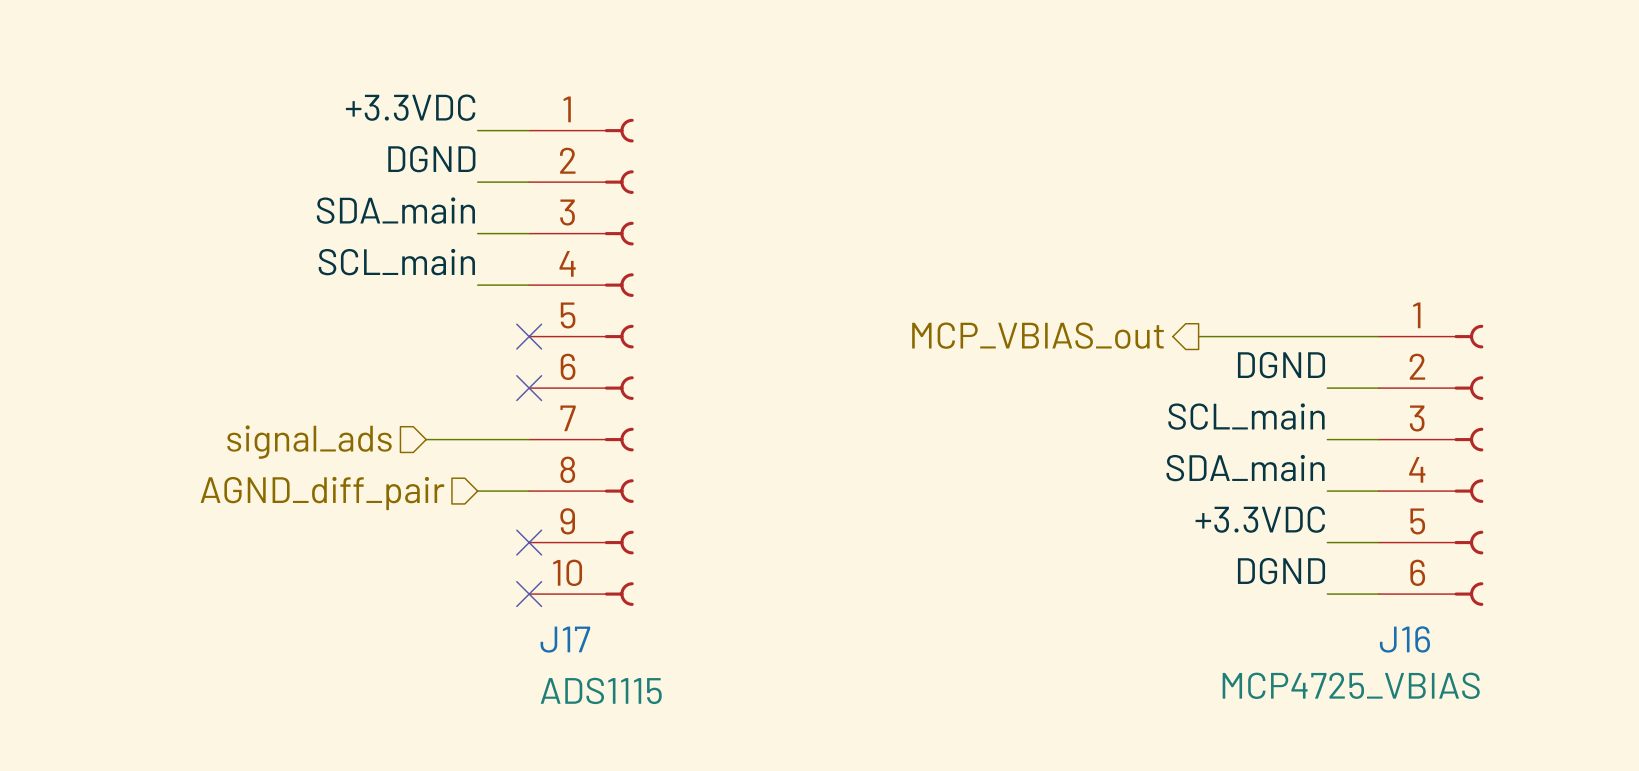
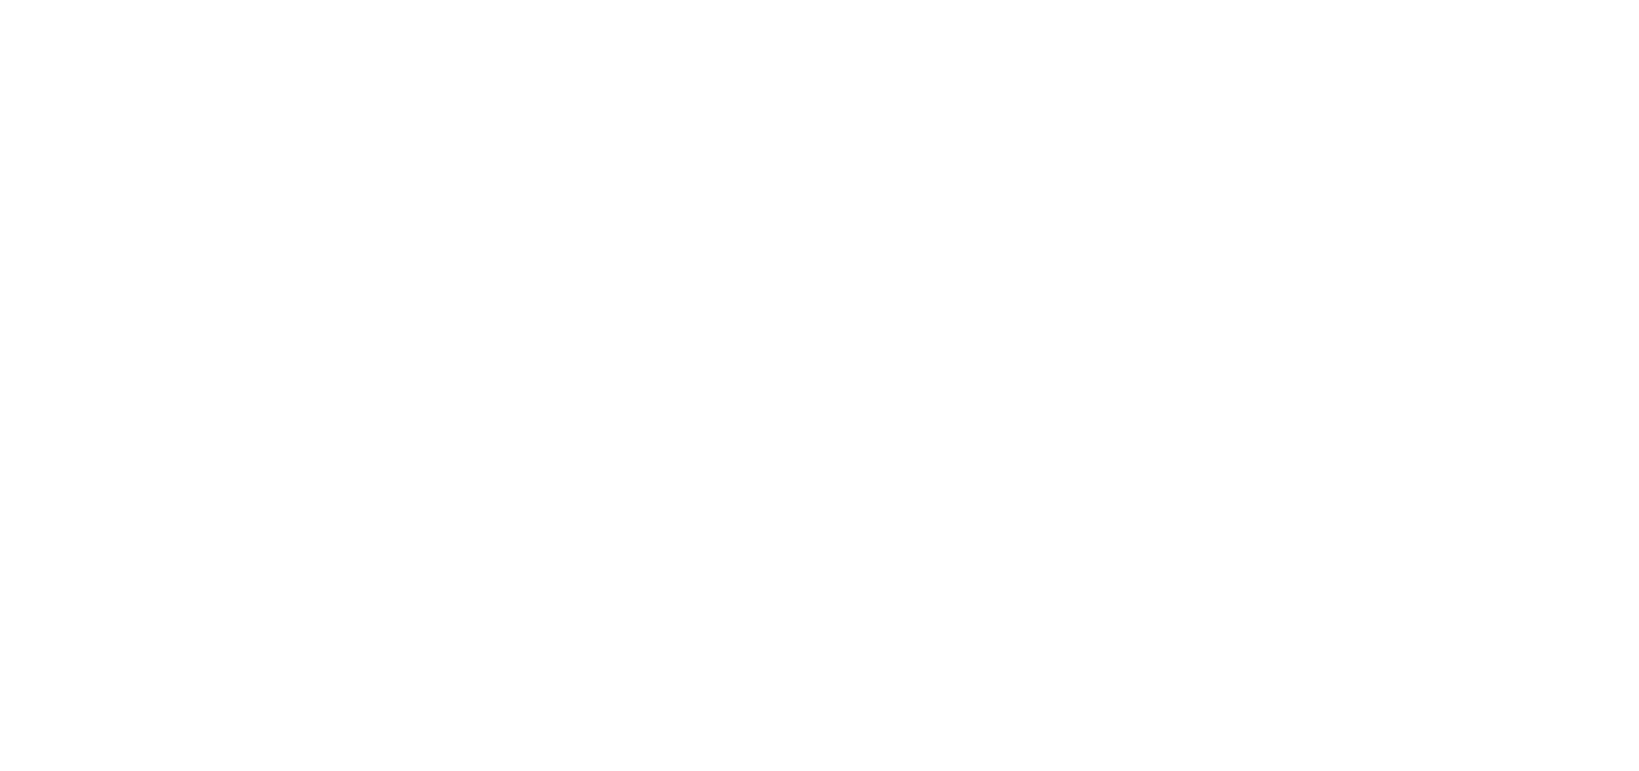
label: +3.3VDC (410, 107) -> none
wire: (477, 130) (529, 130) -> none
label: DGND (431, 159) -> none
wire: (477, 182) (529, 182) -> none
label: SDA_main (395, 210) -> none
wire: (477, 233) (529, 233) -> none
label: SCL_main (396, 262) -> none
wire: (477, 285) (529, 285) -> none
hierarchical label: MCP_VBIAS_out (1037, 335) -> none
no-connect mark: (529, 336) -> none
wire: (1198, 336) (1378, 336) -> none
J17: ADS1115 (581, 362) -> none
label: DGND (1281, 365) -> none
no-connect mark: (529, 388) -> none
wire: (1327, 388) (1378, 388) -> none
label: SCL_main (1246, 416) -> none
wire: (426, 439) (529, 439) -> none
wire: (1327, 439) (1378, 439) -> none
hierarchical label: signal_ads (309, 442) -> none
J16: MCP4725_VBIAS (1431, 465) -> none
label: SDA_main (1245, 468) -> none
wire: (477, 491) (529, 491) -> none
wire: (1327, 491) (1378, 491) -> none
hierarchical label: AGND_diff_pair (322, 493) -> none
label: +3.3VDC (1260, 519) -> none
no-connect mark: (529, 542) -> none
wire: (1327, 542) (1378, 542) -> none
label: DGND (1281, 571) -> none
no-connect mark: (529, 594) -> none
wire: (1327, 594) (1378, 594) -> none

